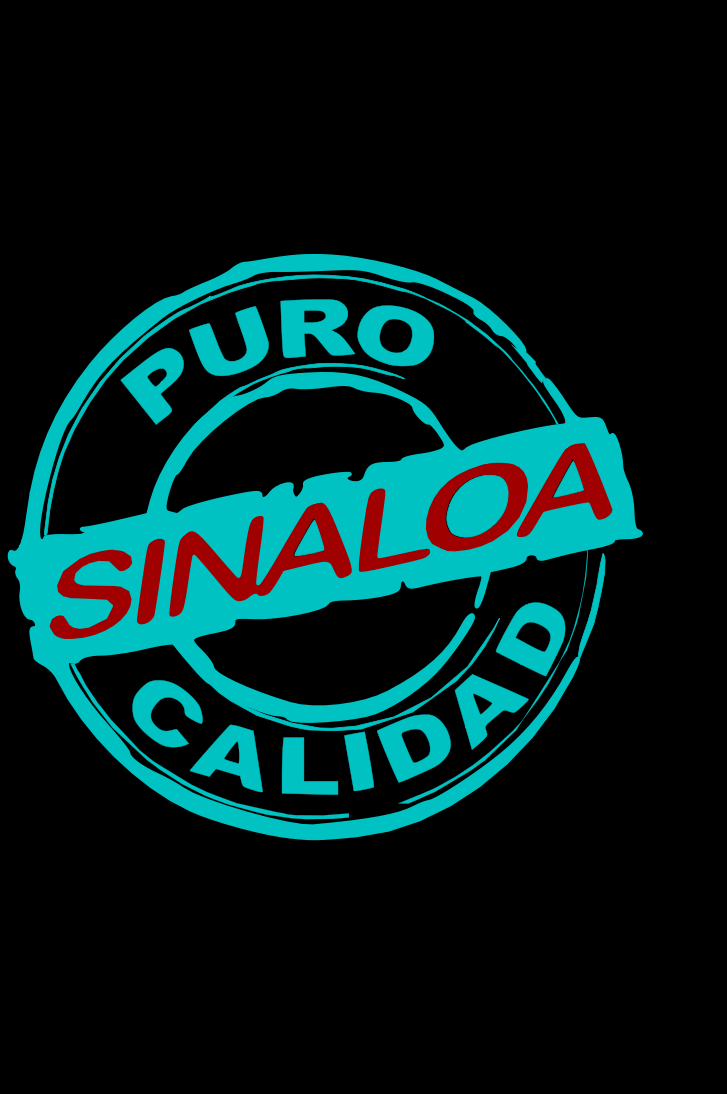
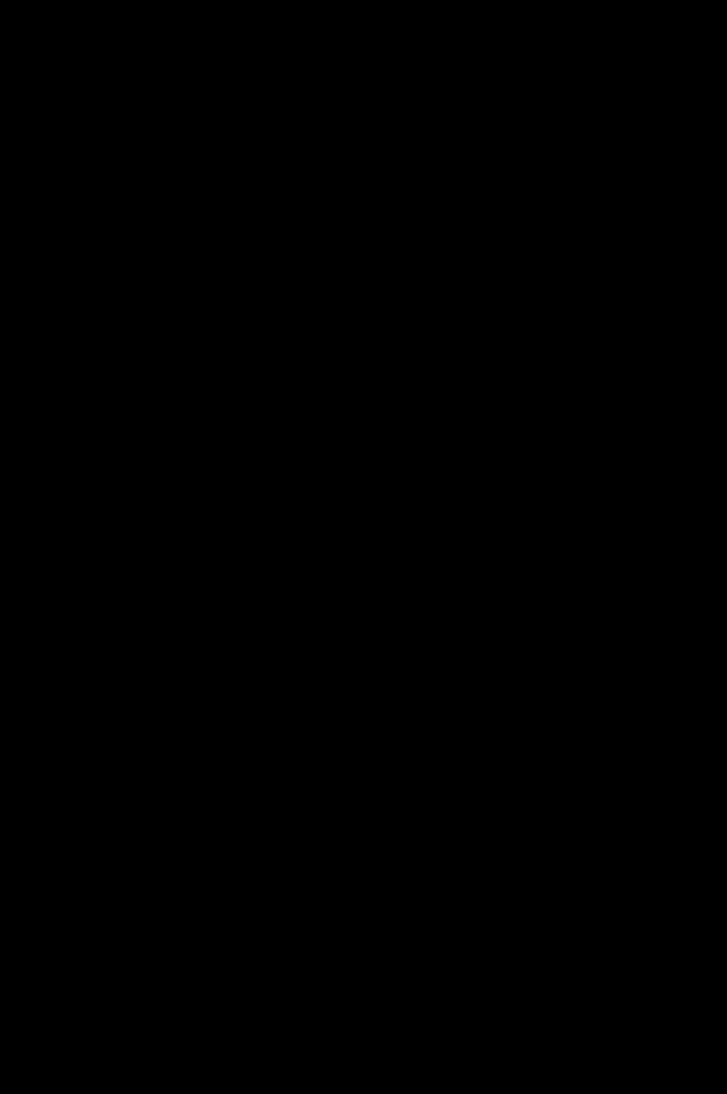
drawing: [7, 253, 643, 841] -> none

